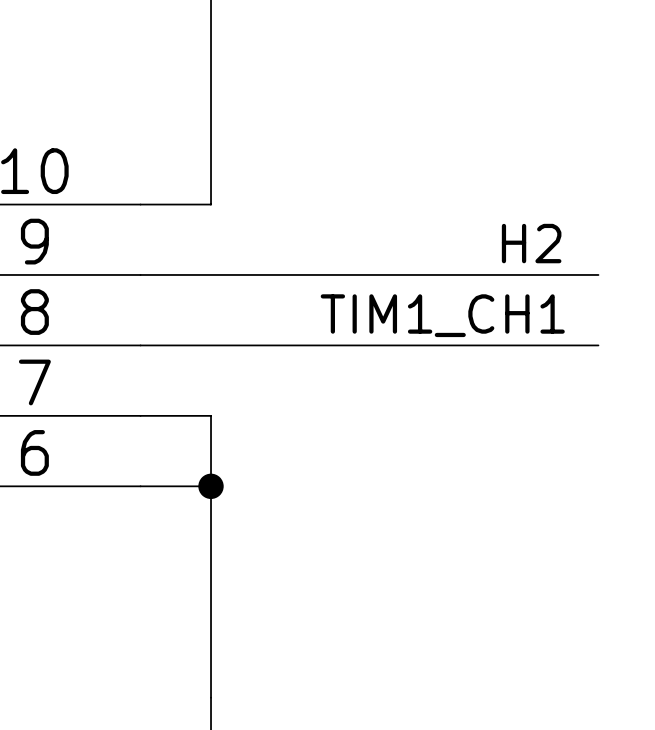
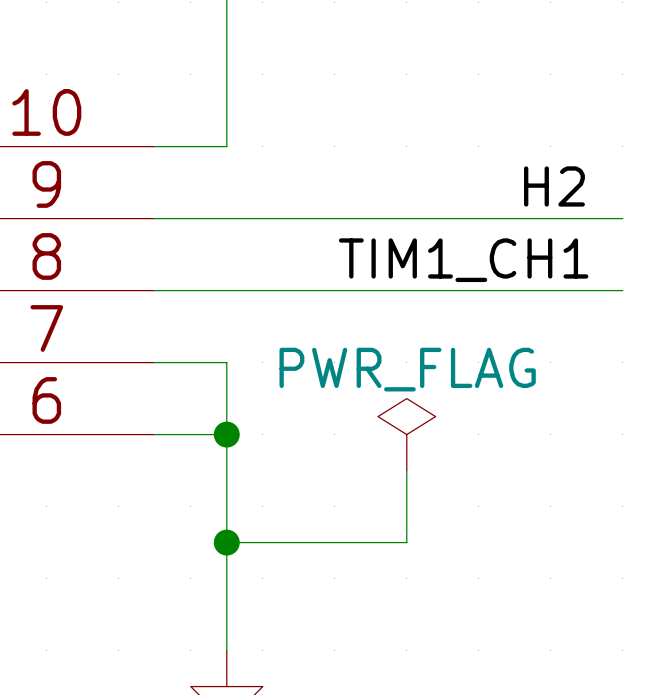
power symbol: none -> PWR_FLAG (406, 434)
wire: none -> (406, 470) (406, 542) (226, 542)
junction: none -> (226, 542)

